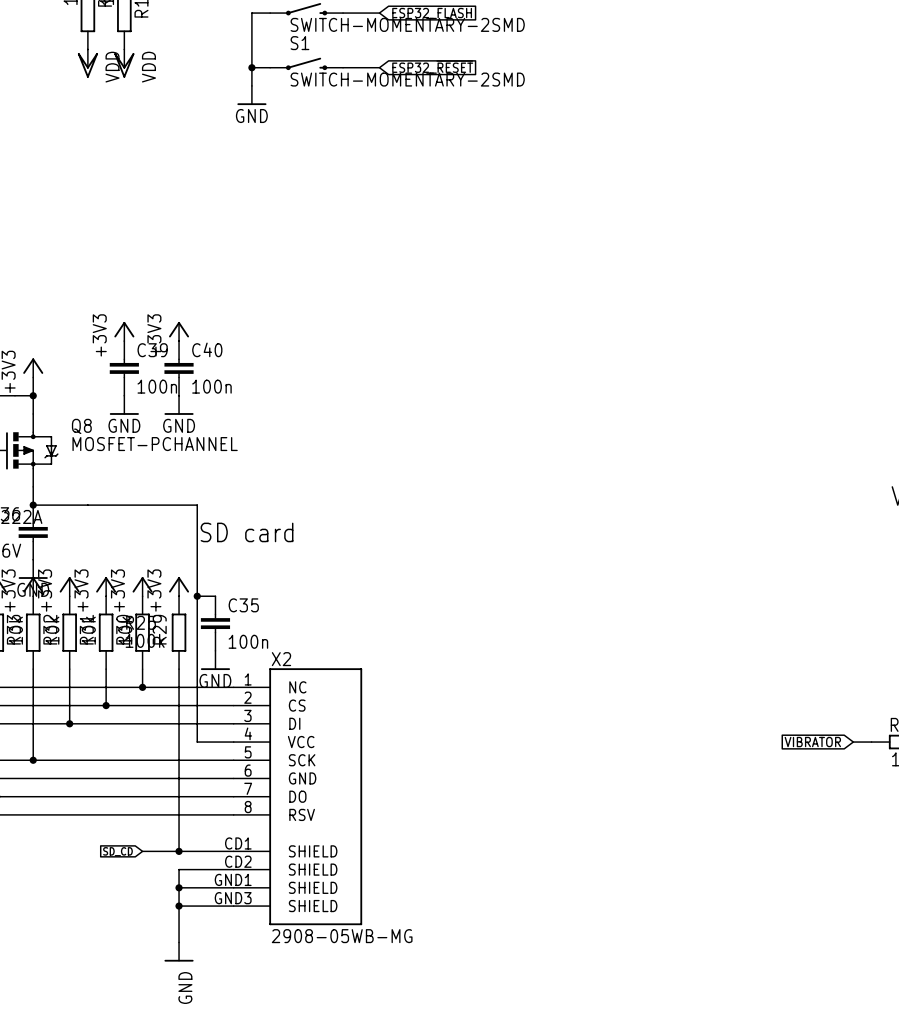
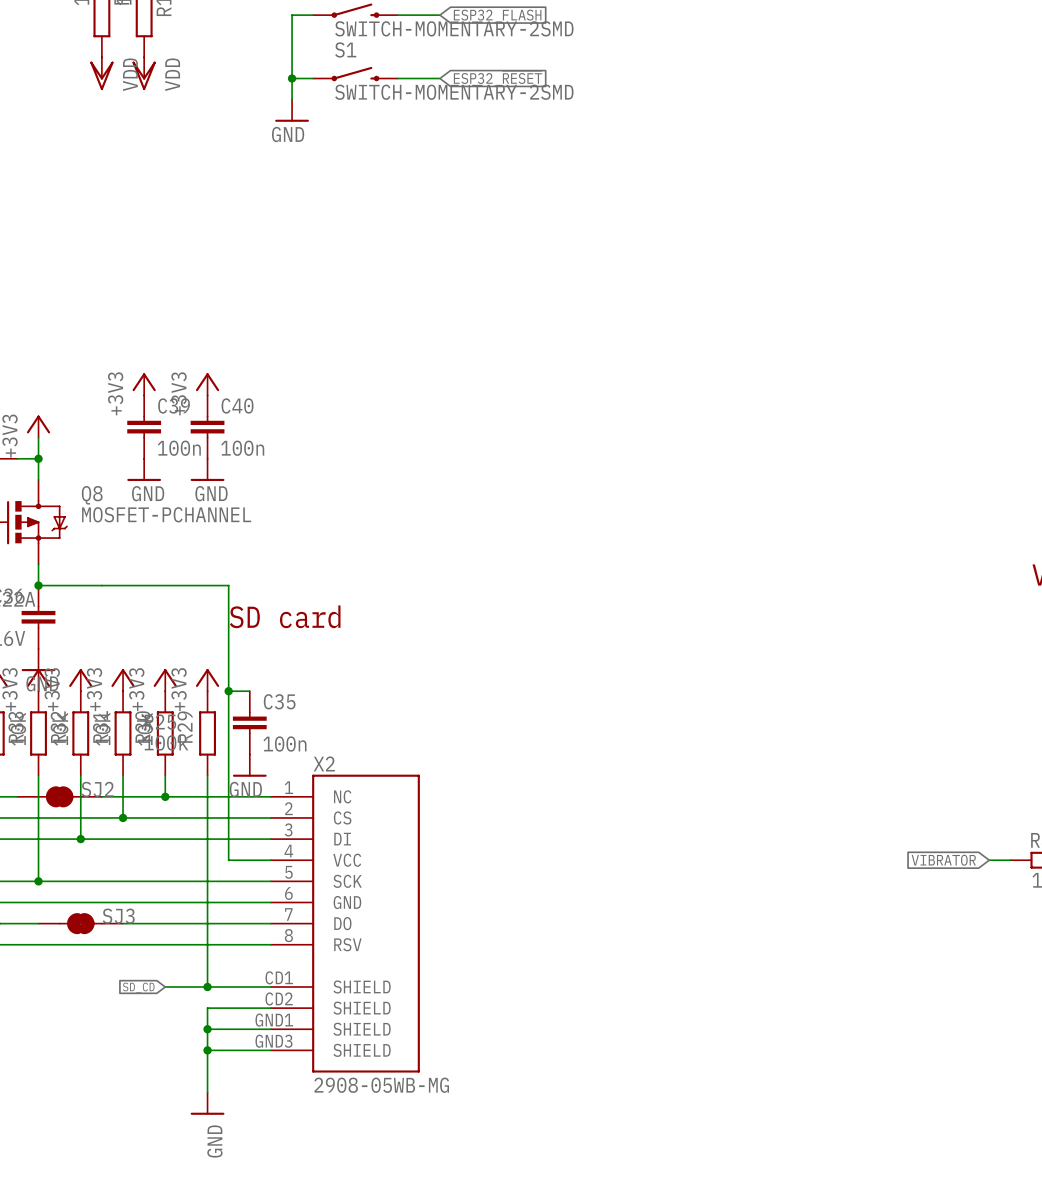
SJ2: none -> (59, 796)
SJ3: none -> (80, 923)

